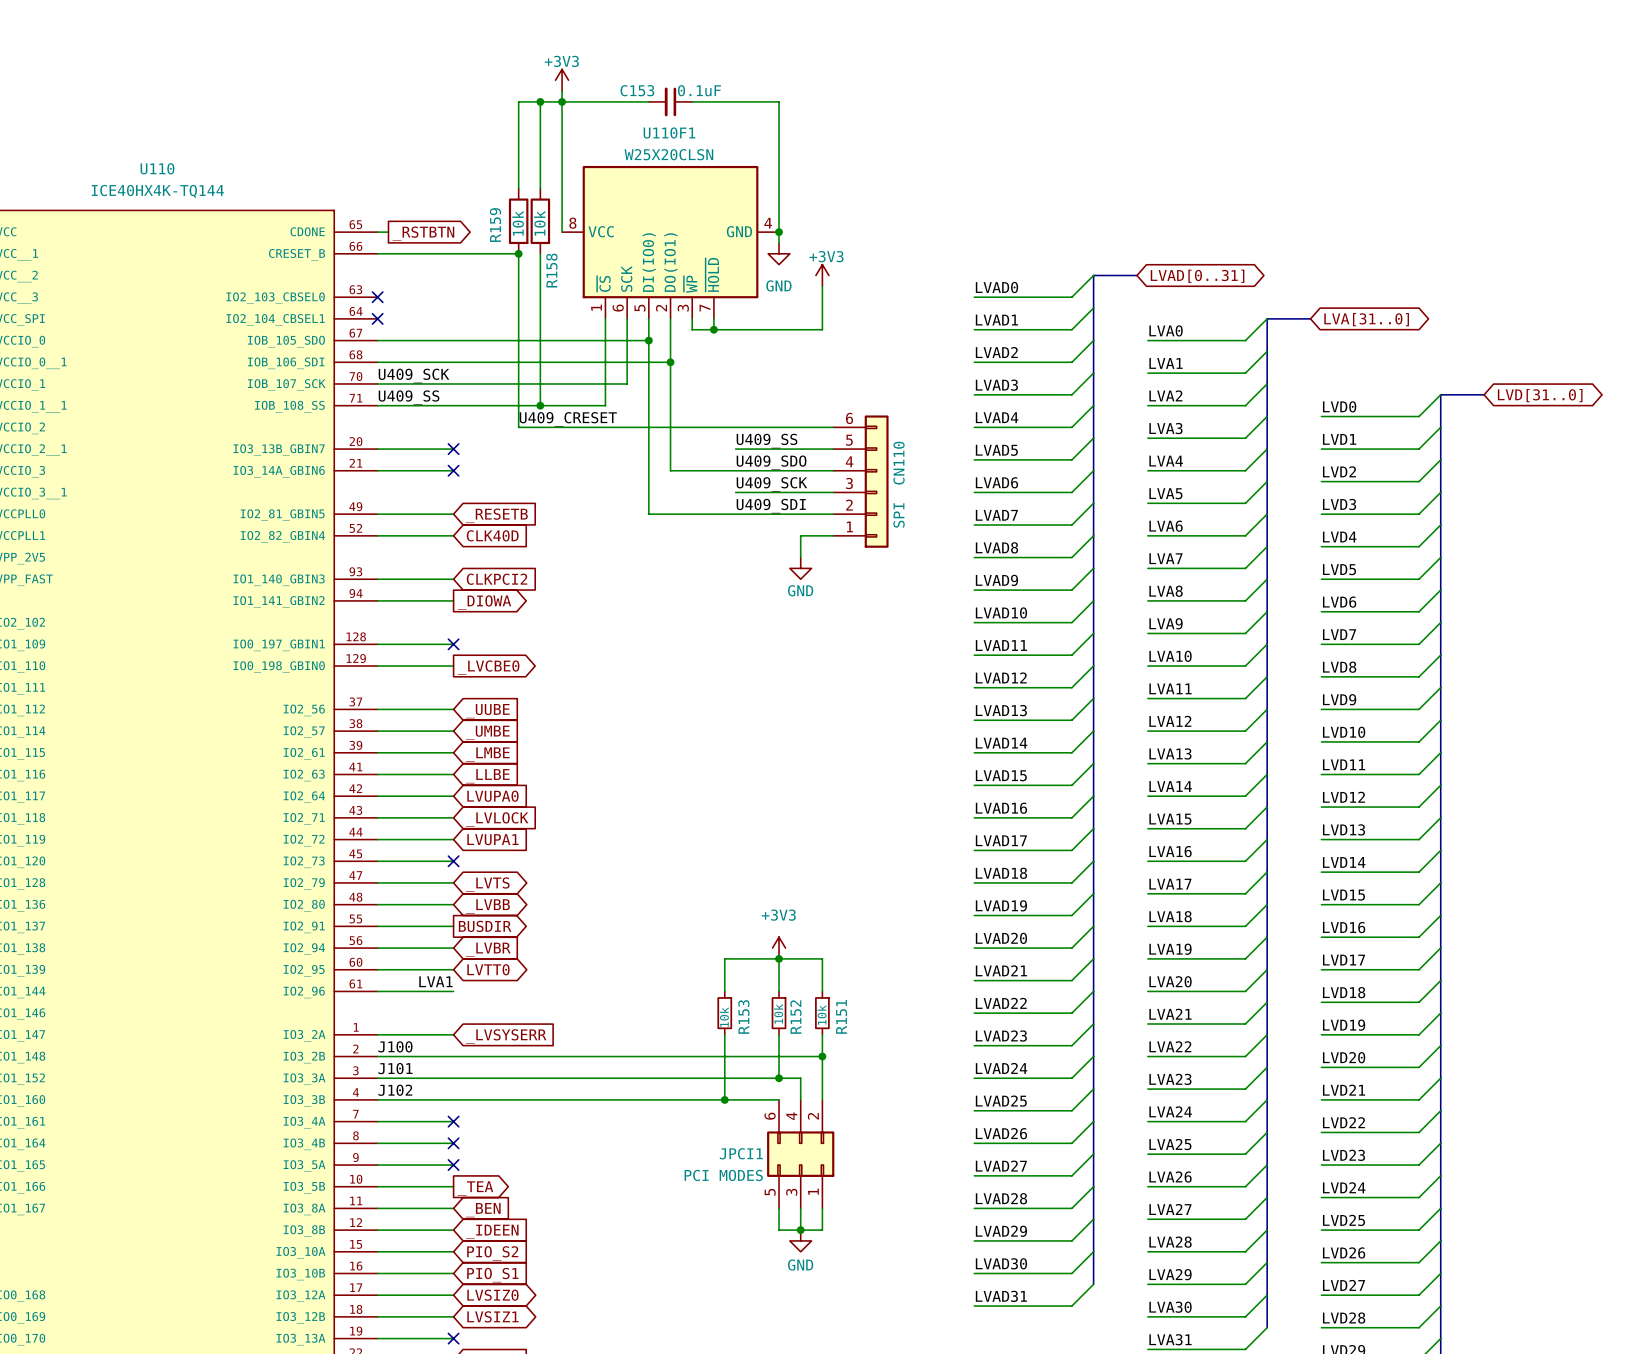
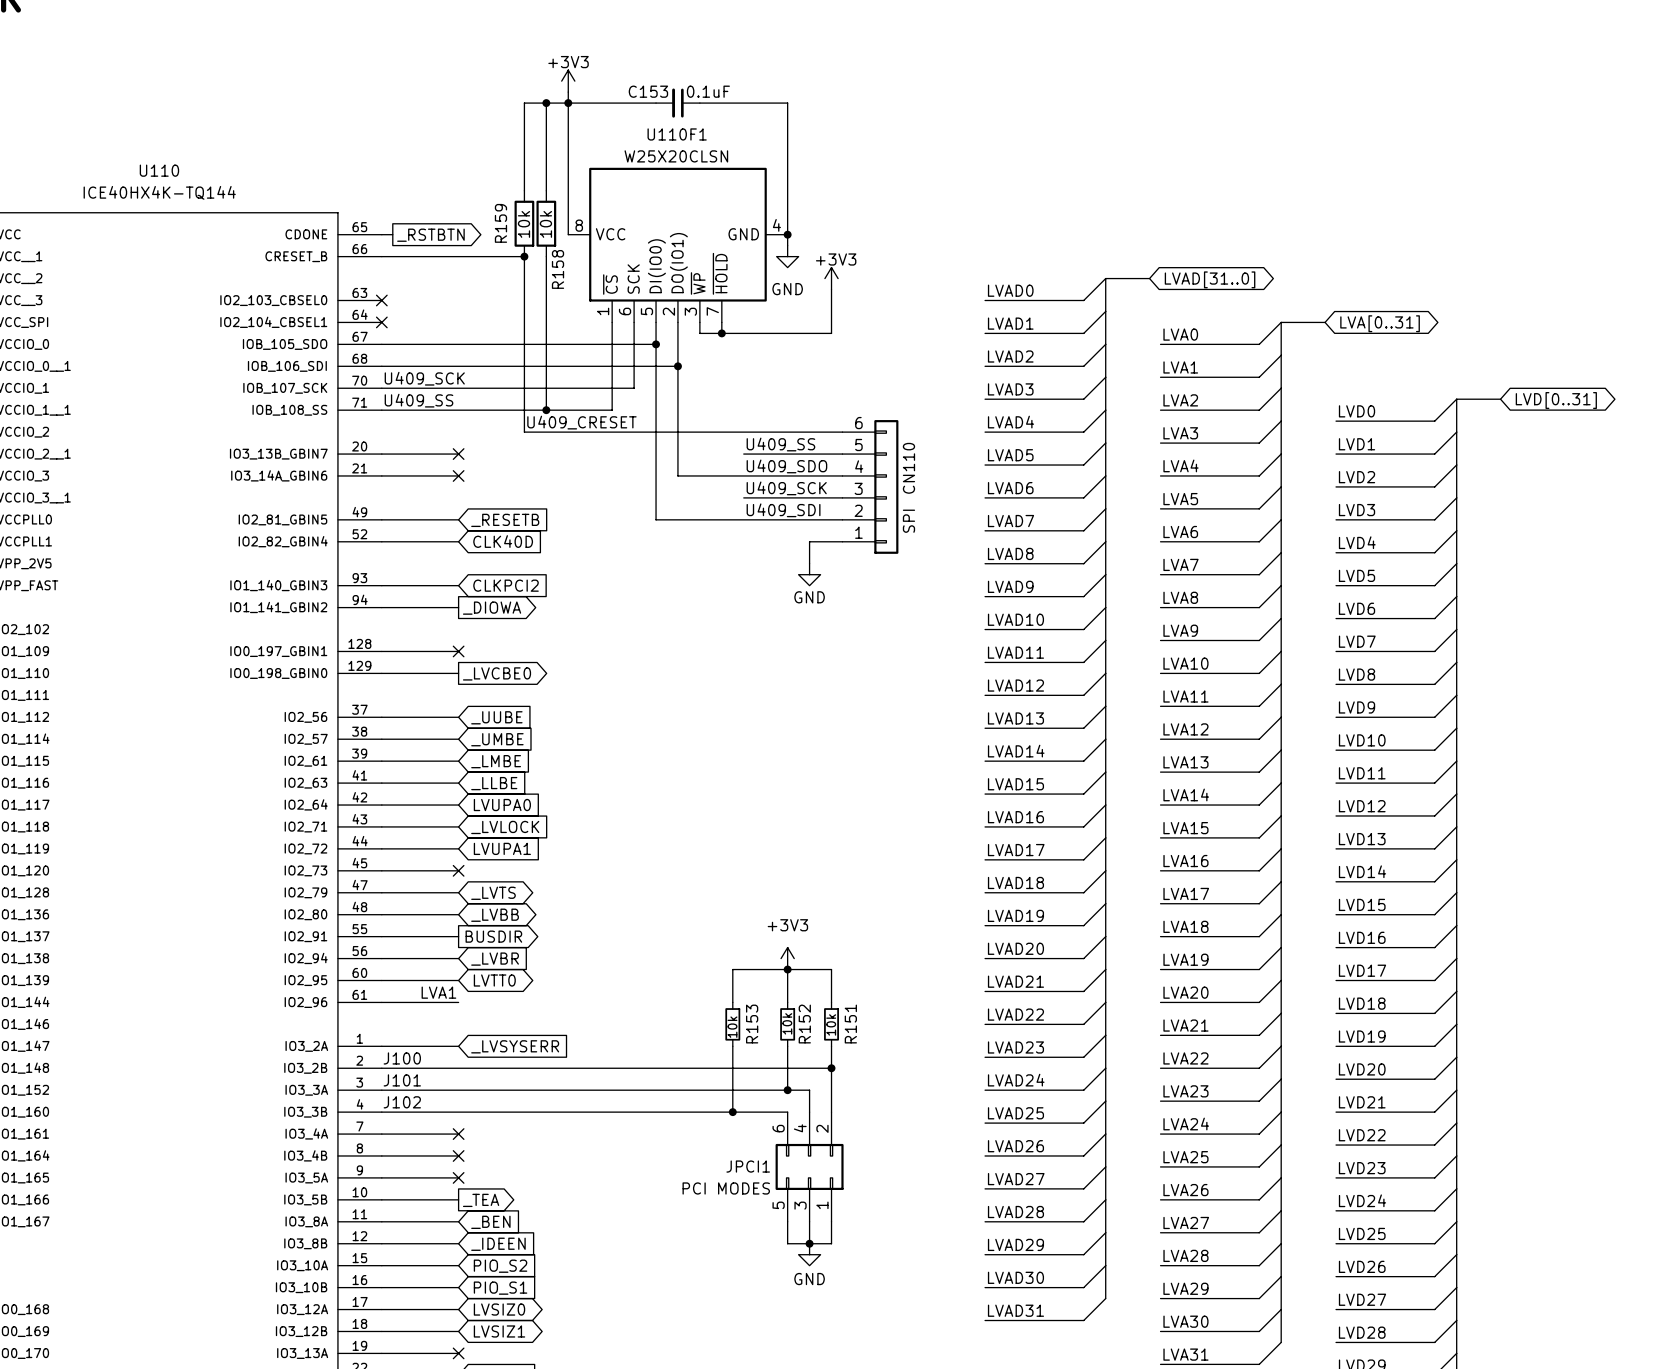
global label: LVAD[0..31] (1197, 276) -> LVAD[31..0] (1210, 279)
global label: LVA[31..0] (1366, 319) -> LVA[0..31] (1380, 323)
global label: LVD[31..0] (1540, 395) -> LVD[0..31] (1556, 400)

